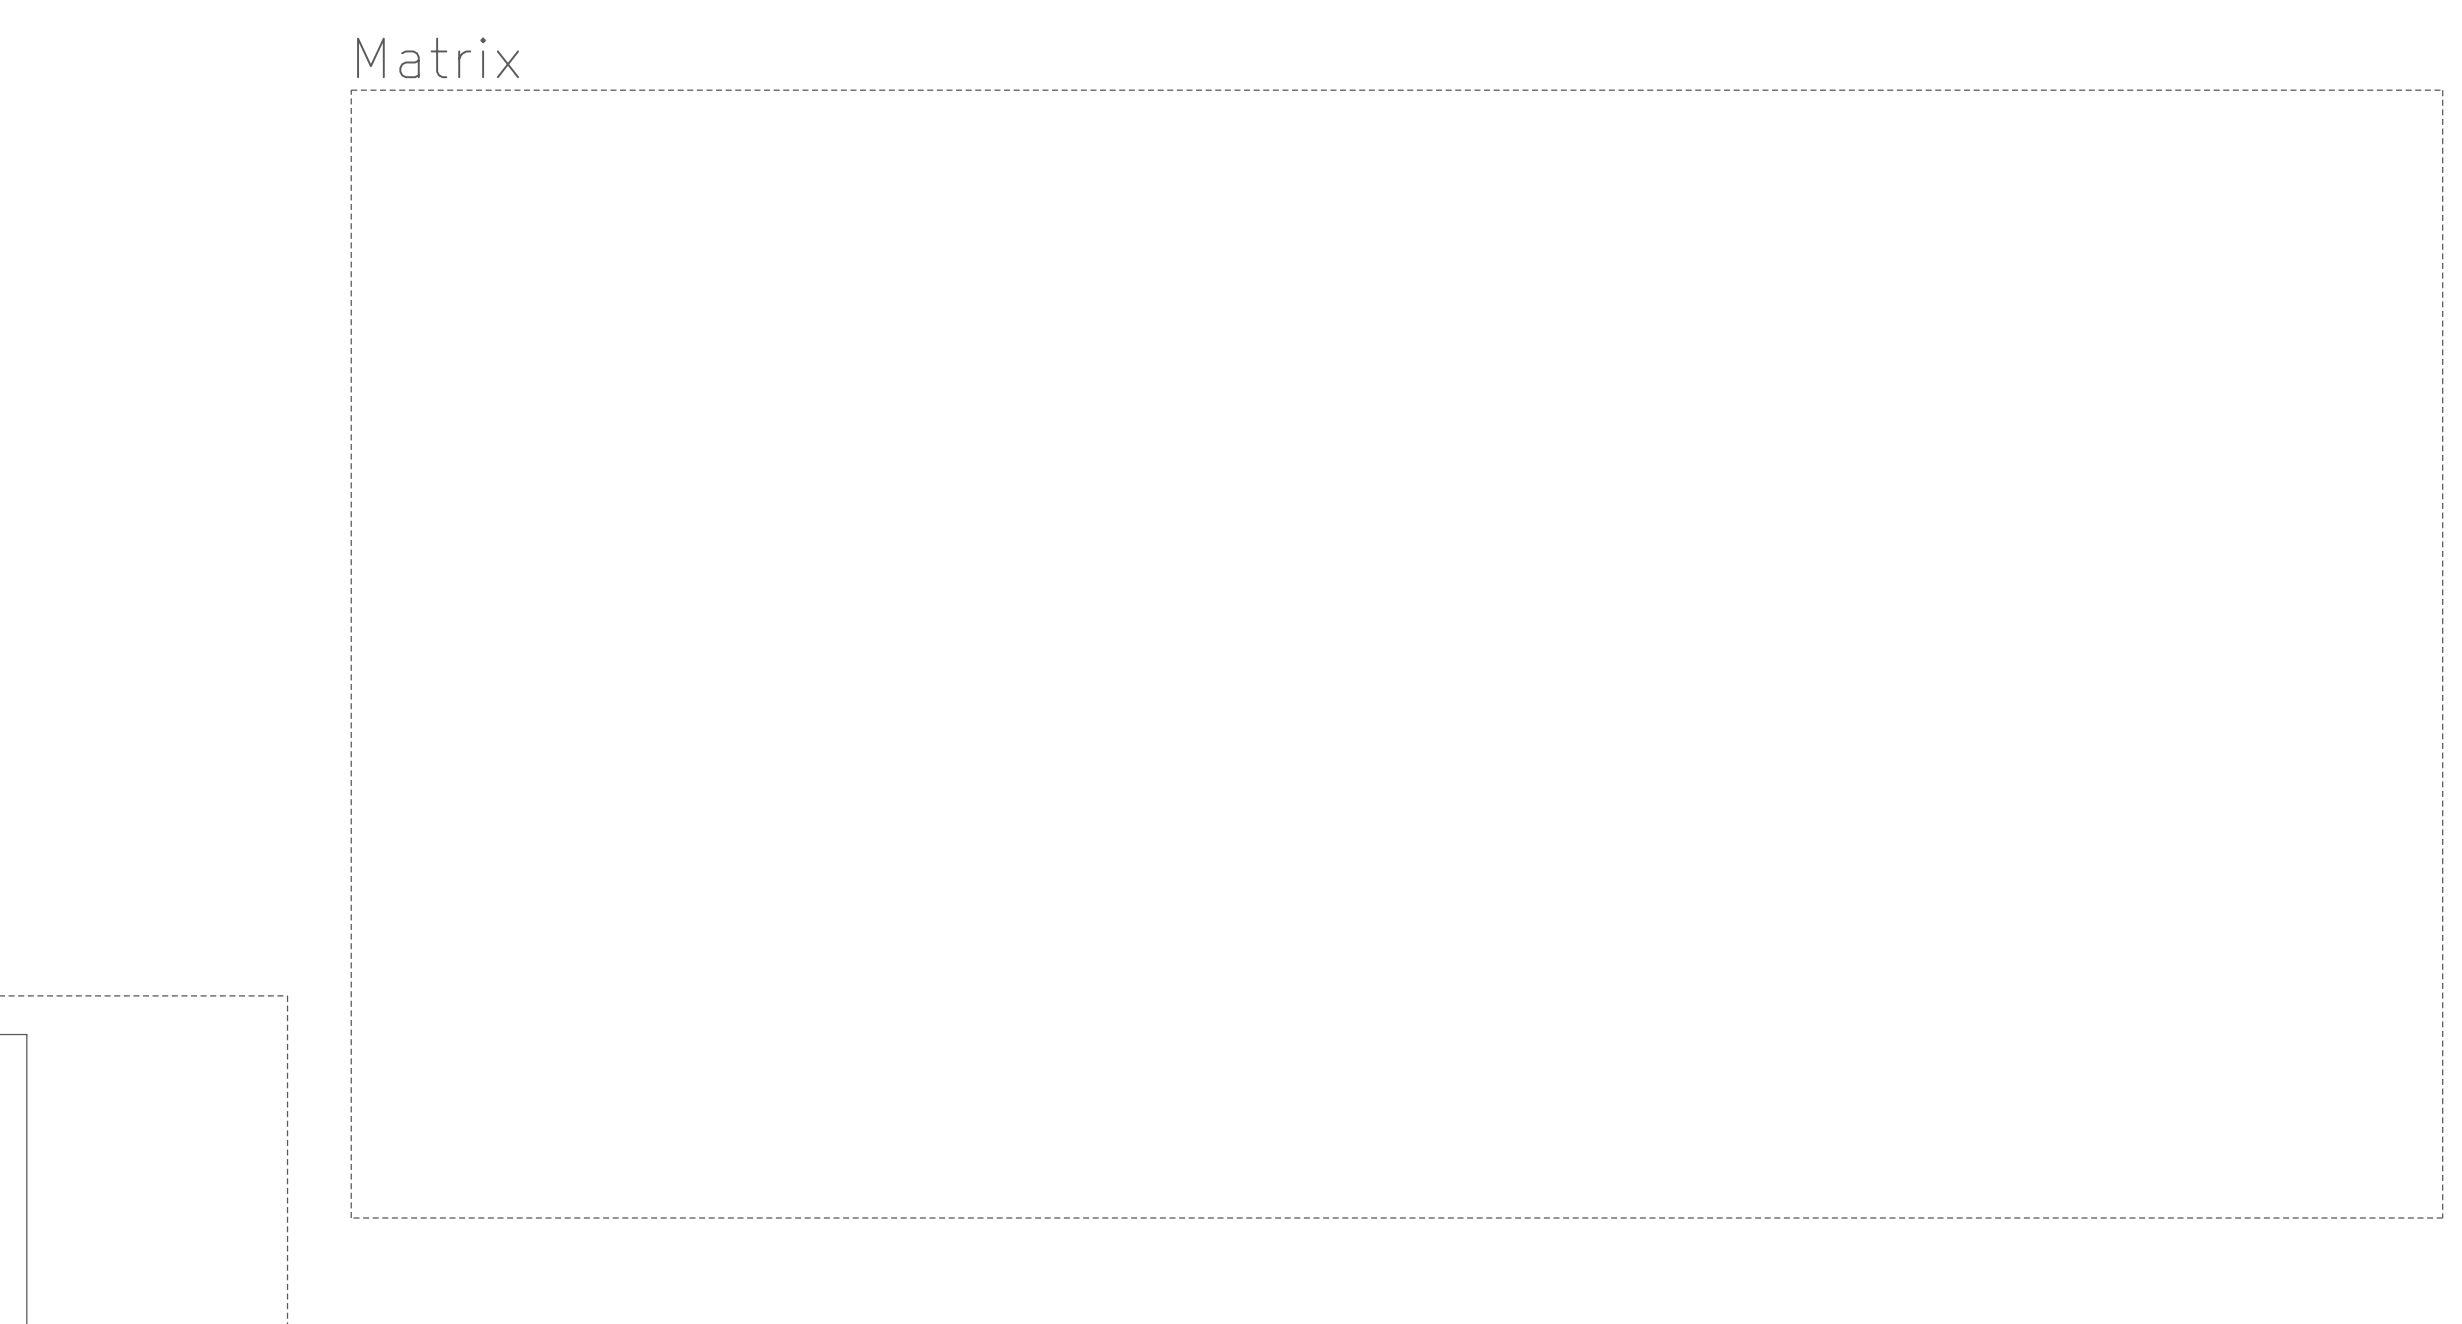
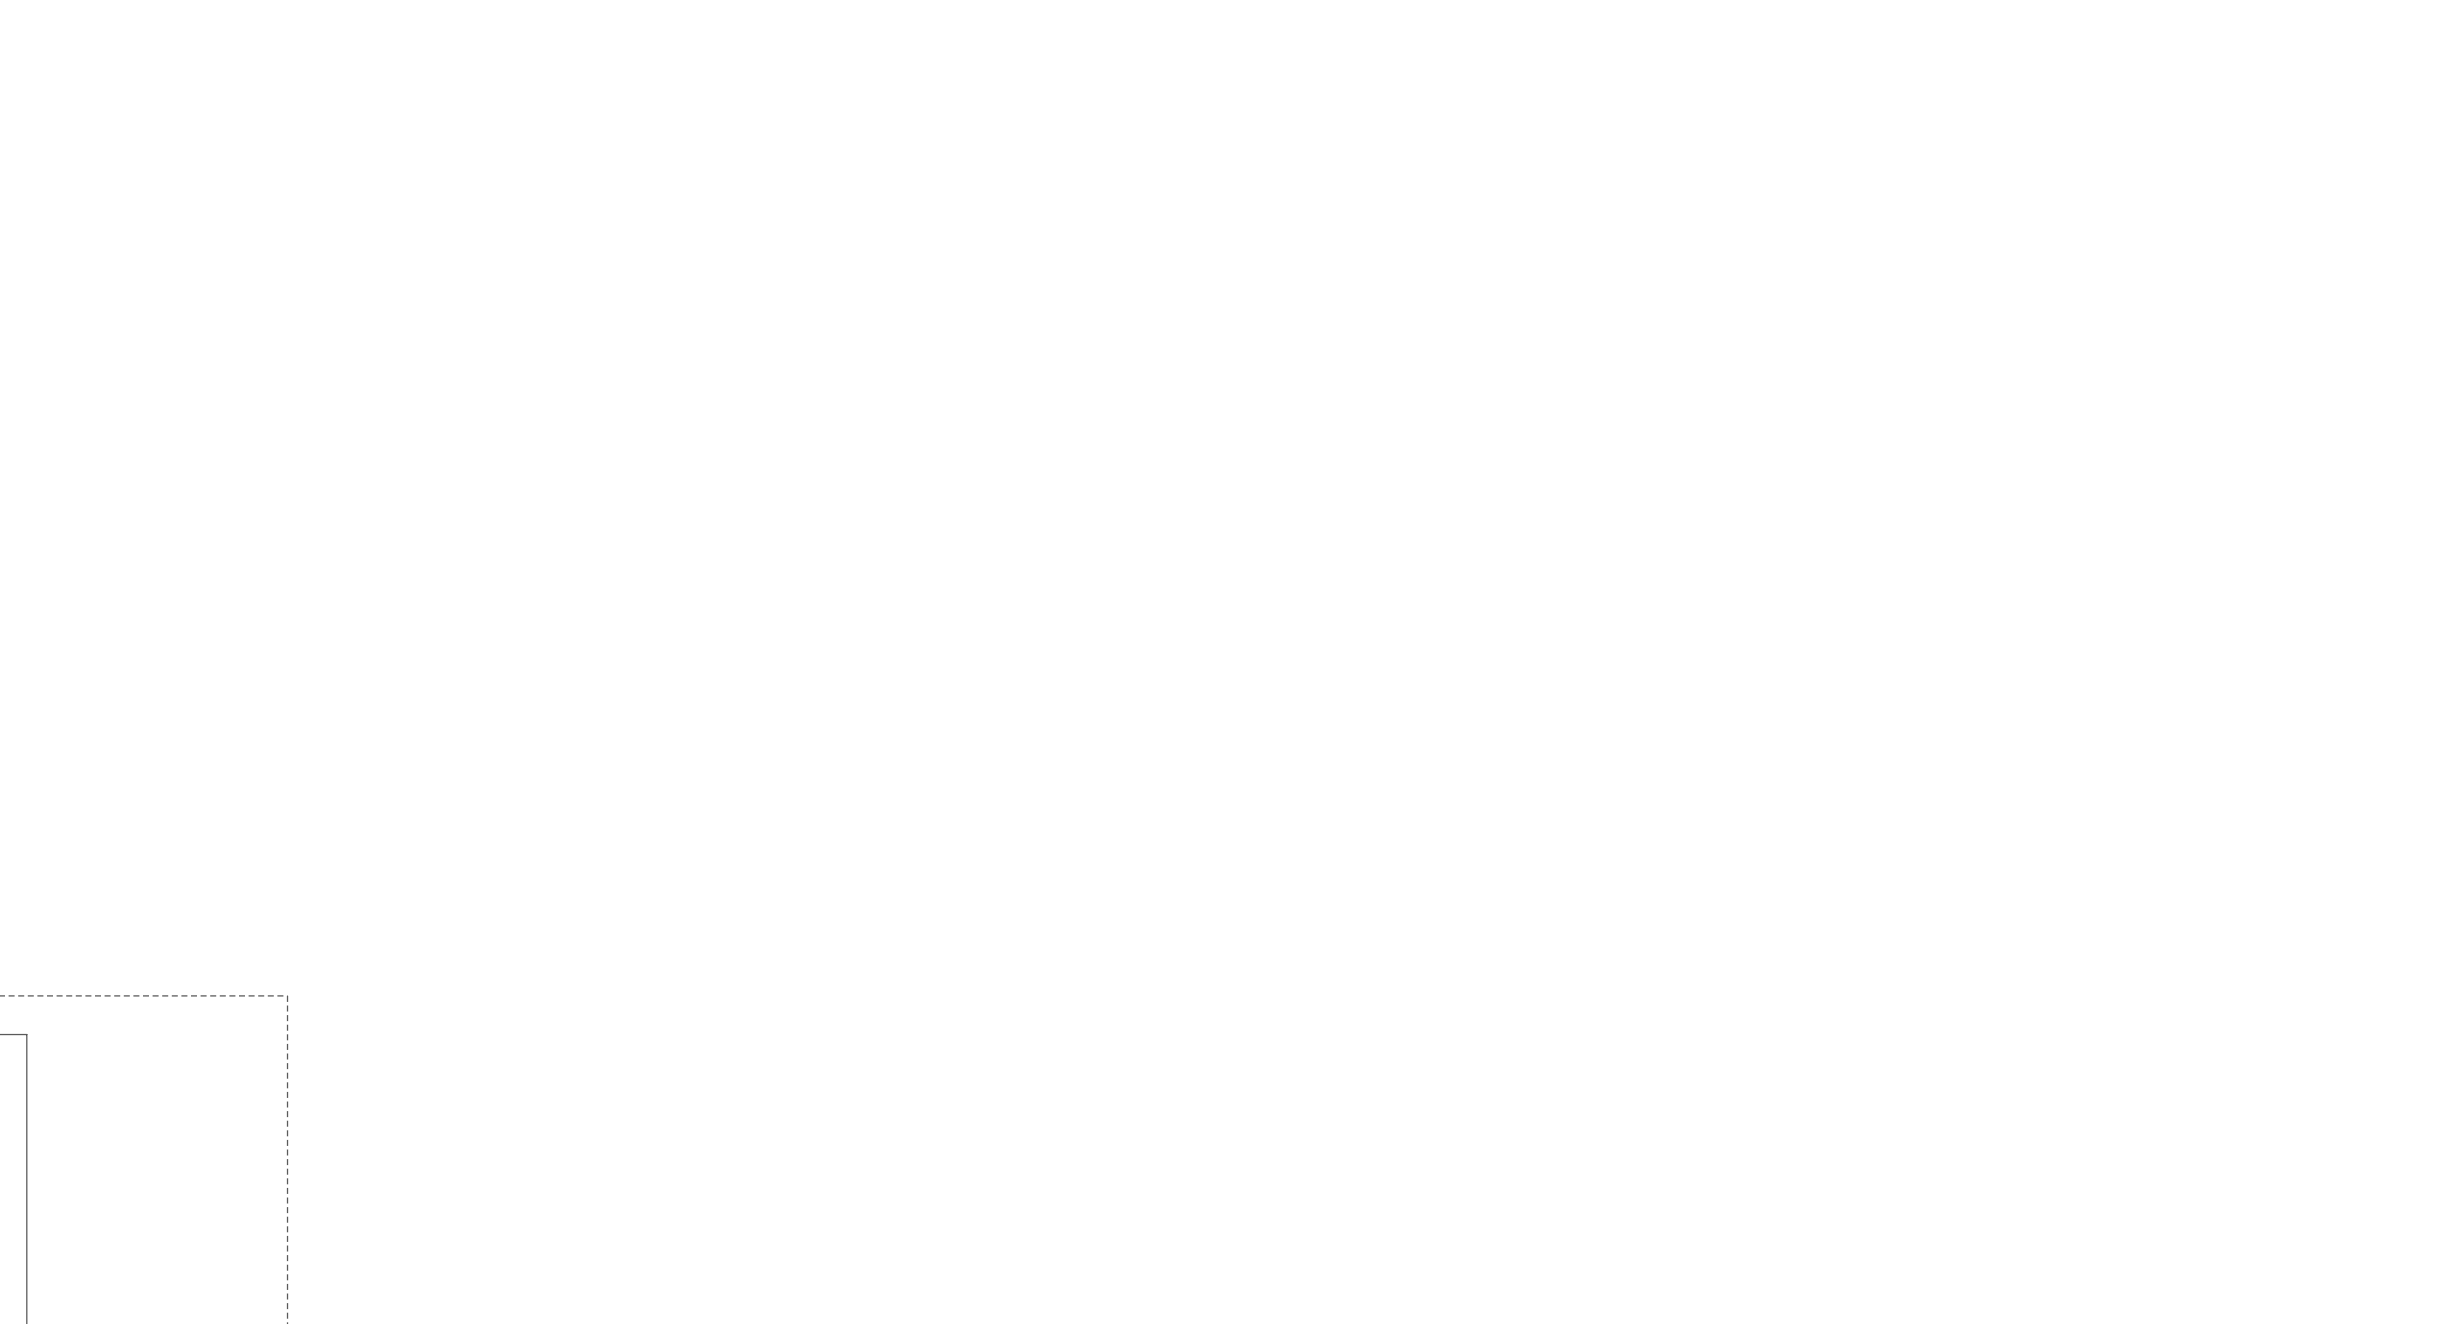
text: Matrix (438, 57) -> none
line: (351, 90) (2442, 90) (2442, 1217) (351, 1217) (351, 90) -> none

